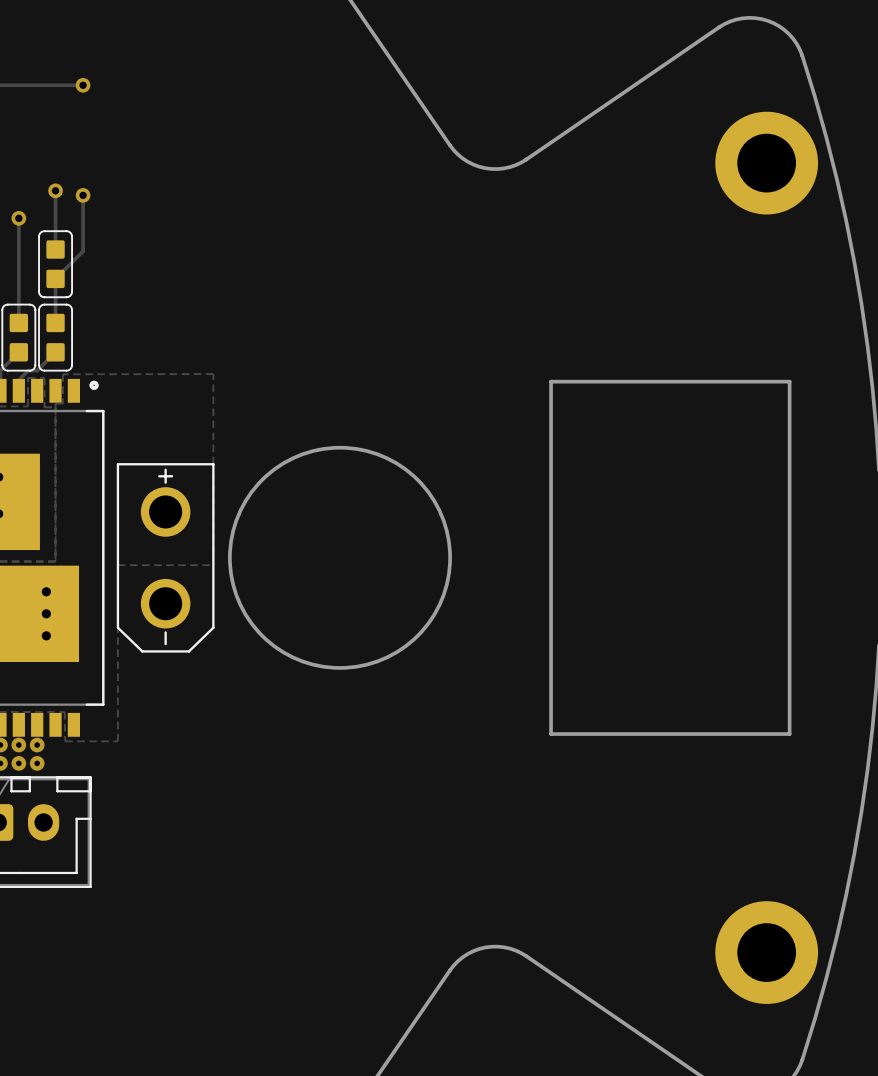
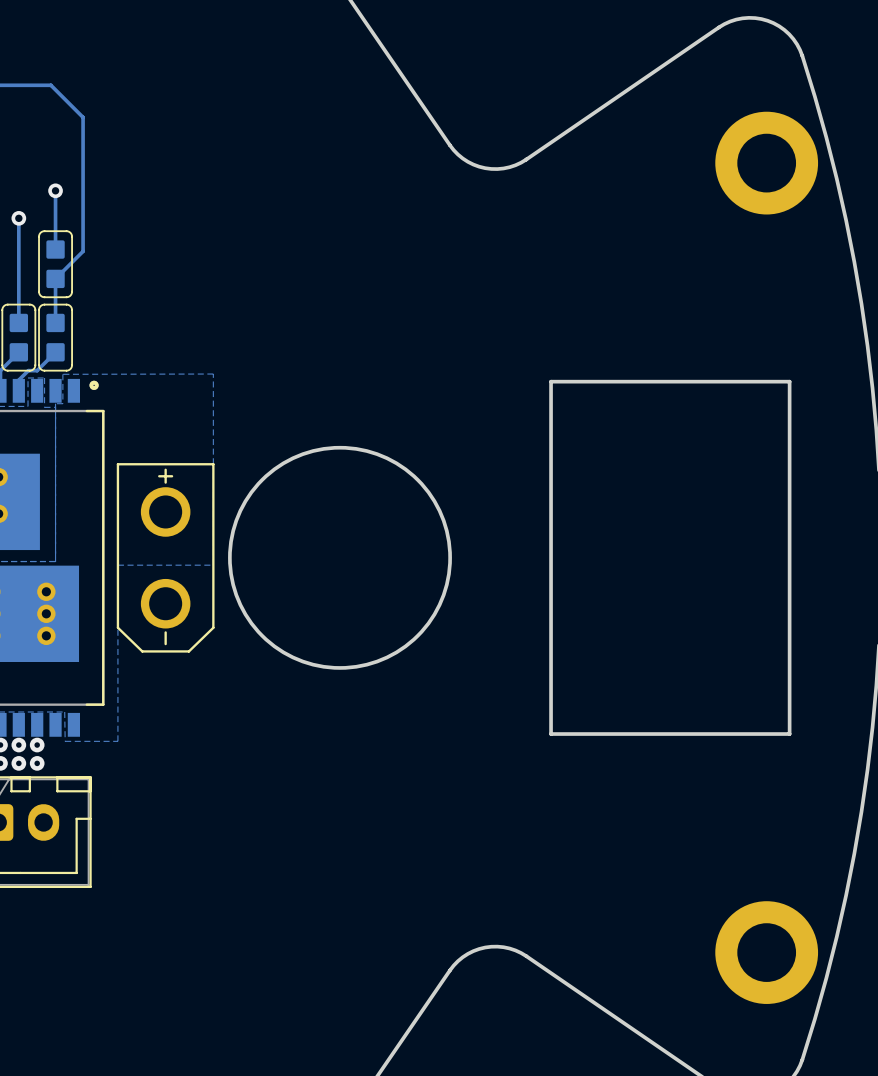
track: (83, 85) (50, 85) -> (83, 195) (83, 117) (50, 85)
via: (83, 85) -> none
via: (83, 195) -> none

